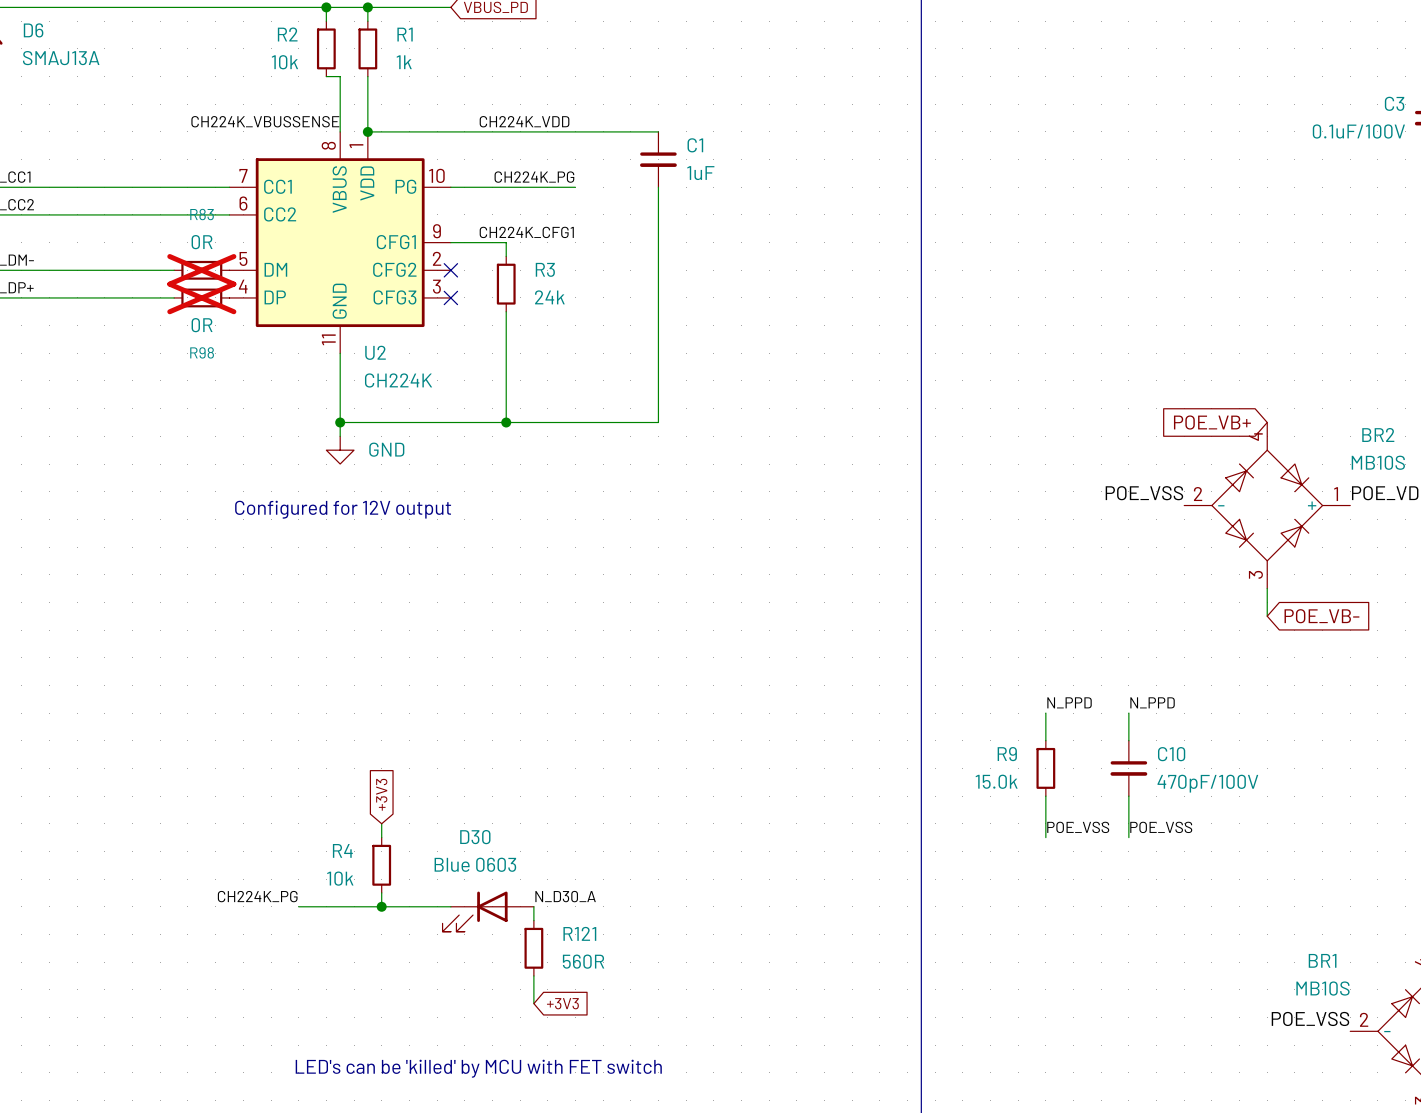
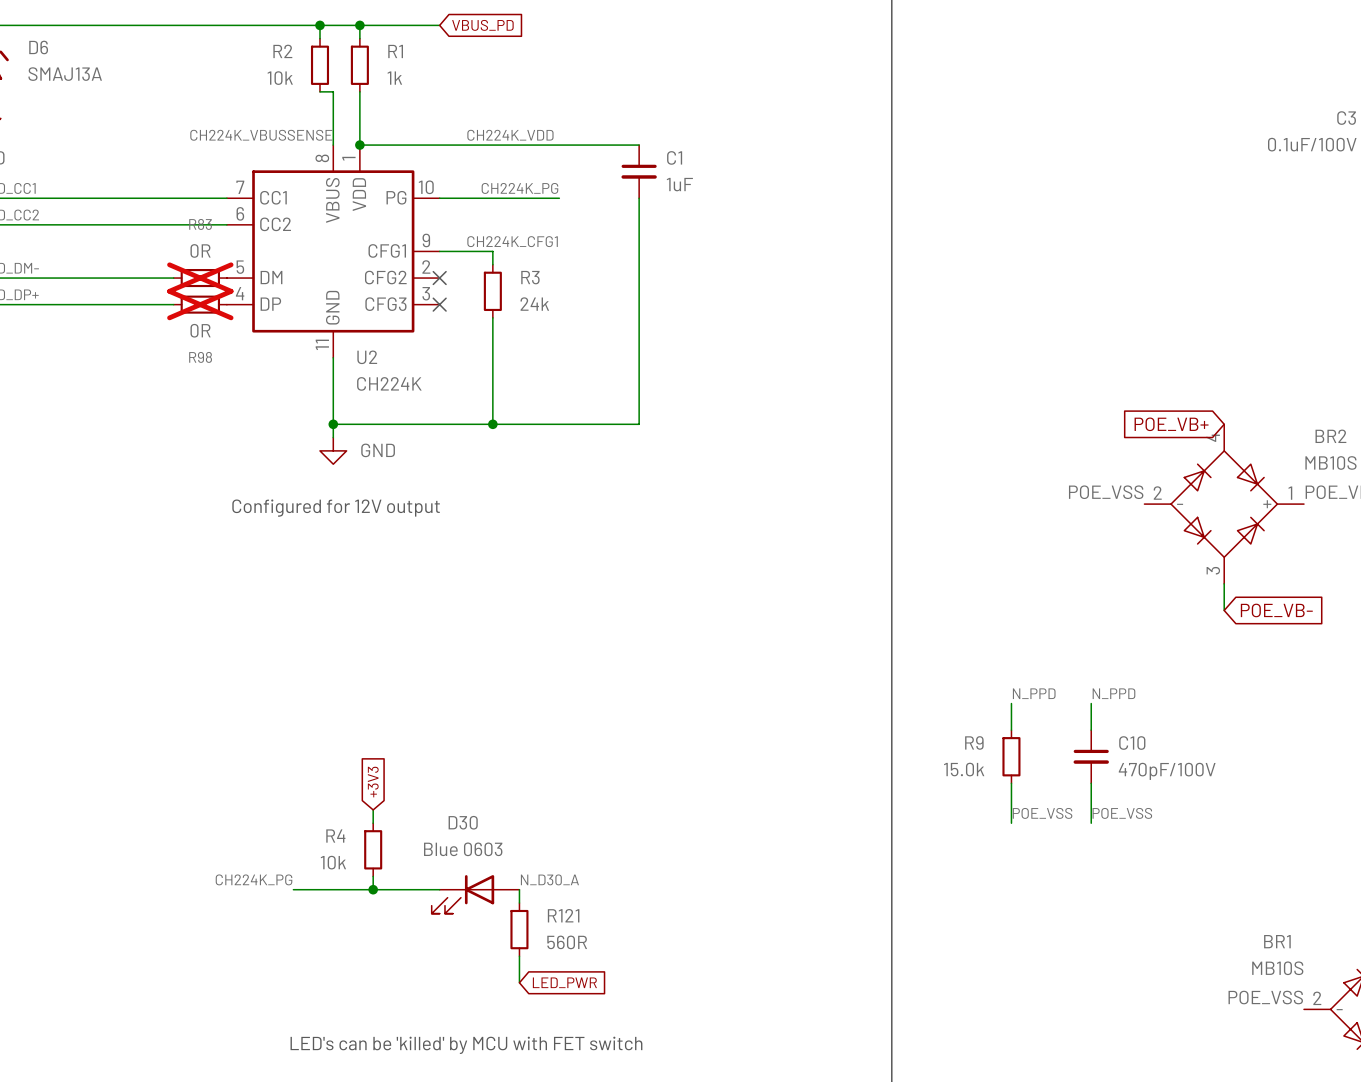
global label: +3V3 (562, 1003) -> LED_PWR (564, 982)

